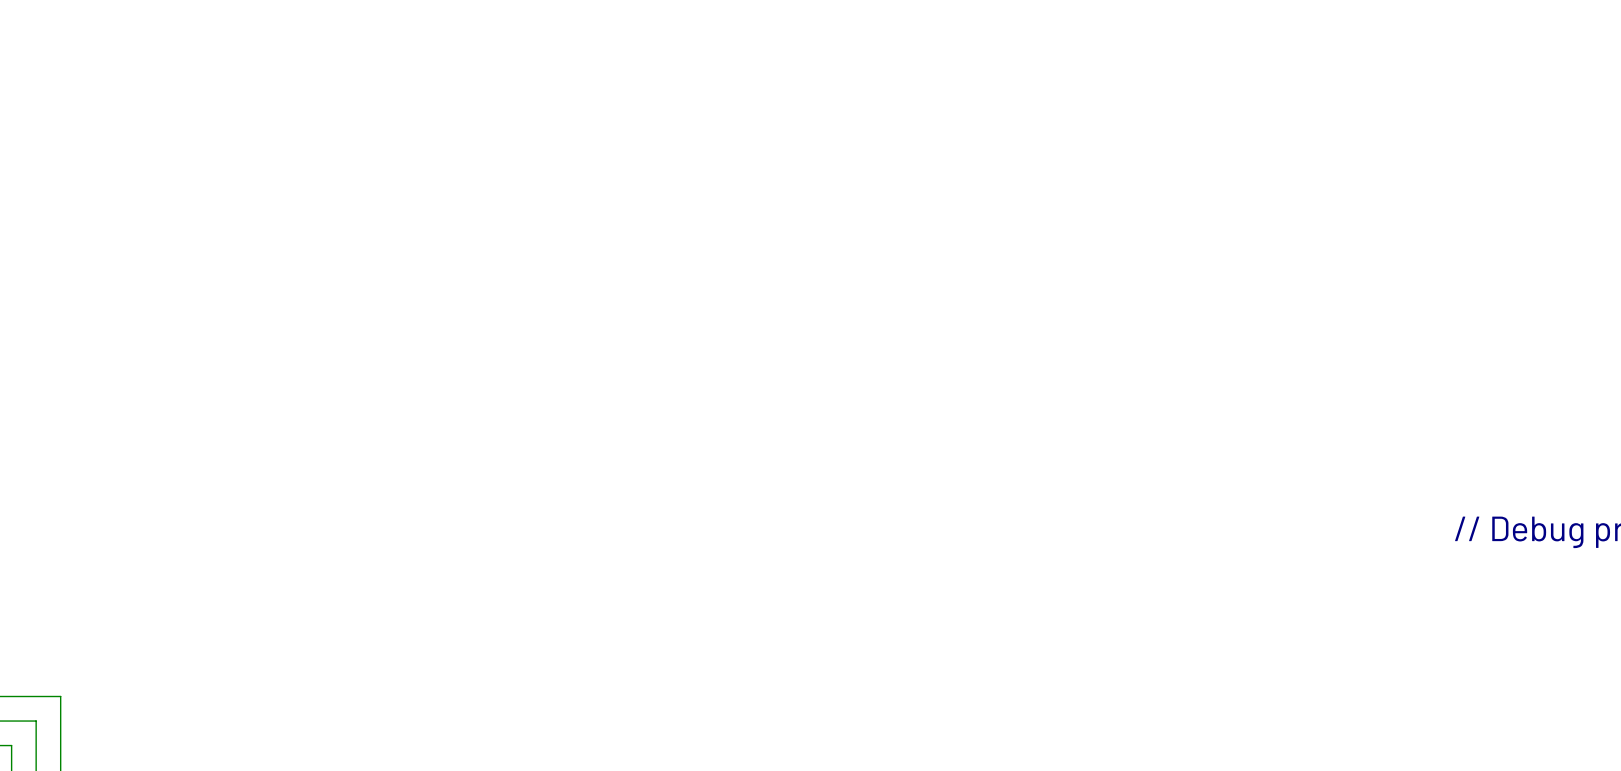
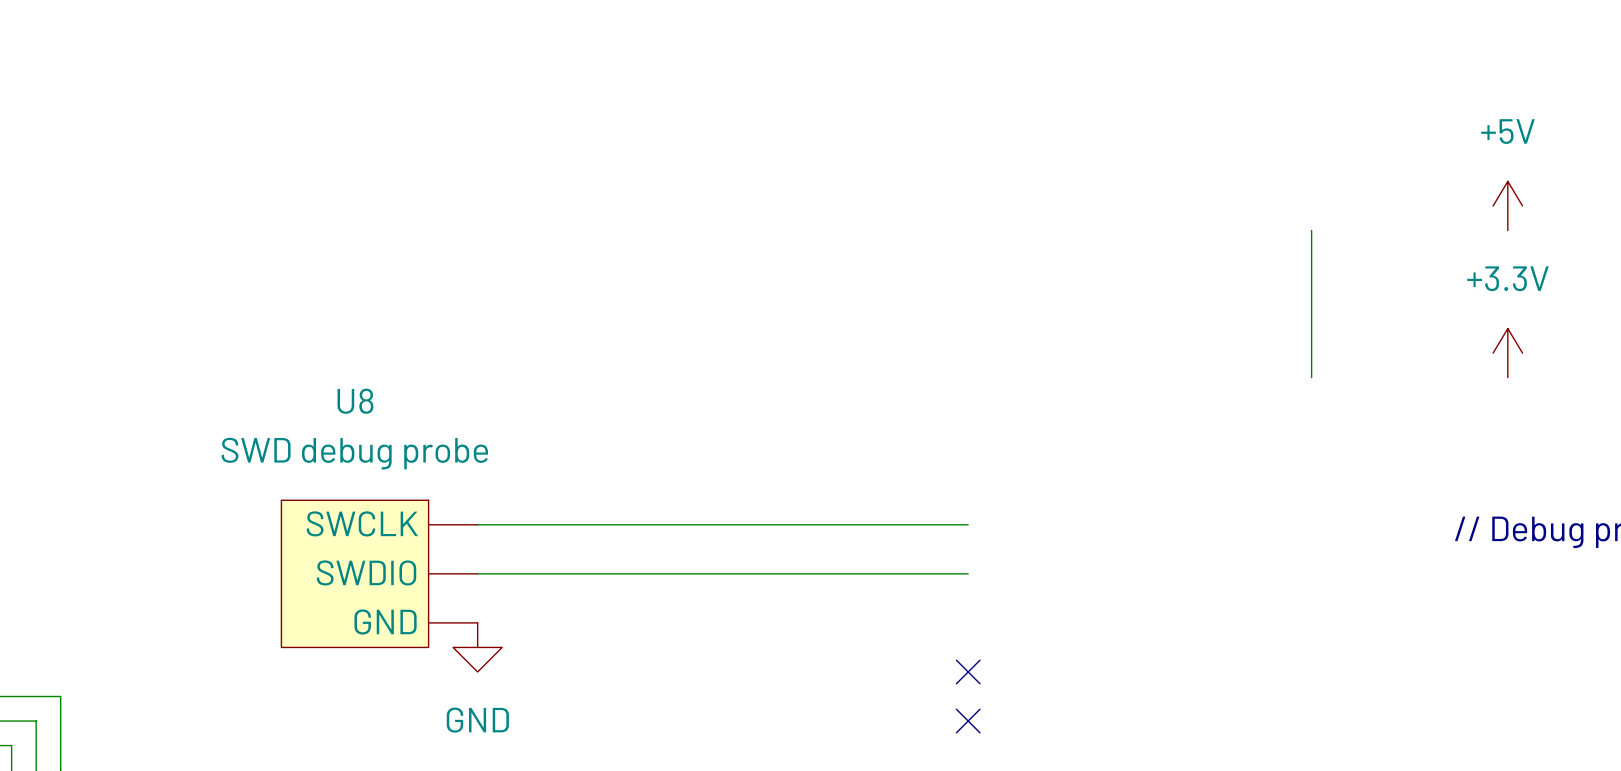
power symbol: none -> +5V (1507, 205)
wire: none -> (1311, 230) (1311, 377)
power symbol: none -> +3.3V (1507, 353)
wire: none -> (477, 524) (968, 524)
U8: none -> SWD debug probe (379, 573)
wire: none -> (477, 573) (968, 573)
power symbol: none -> GND (477, 647)
no-connect mark: none -> (968, 671)
no-connect mark: none -> (968, 721)

